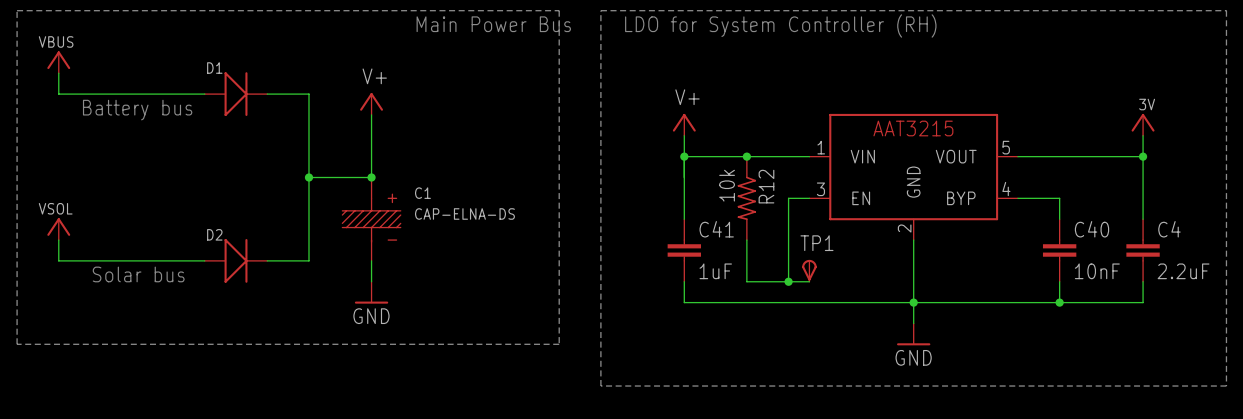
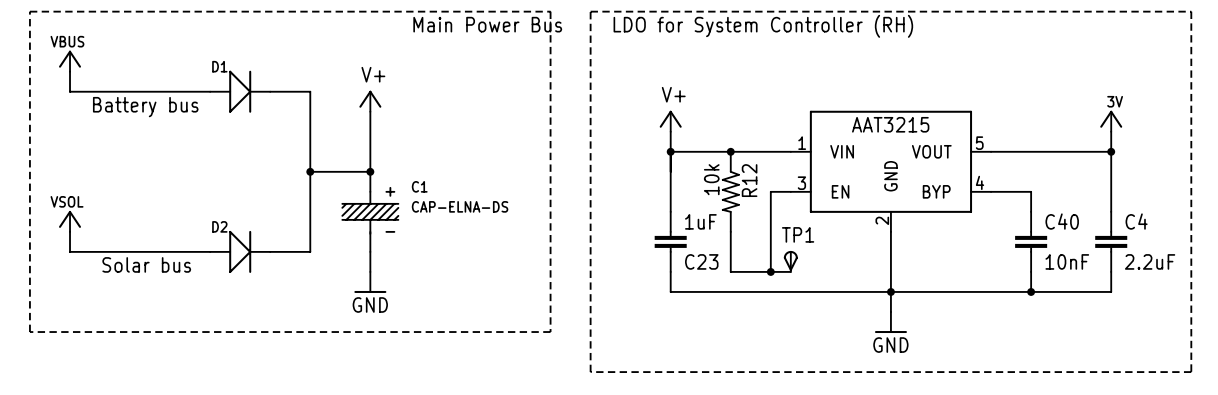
C41 name: C41 (716, 229) -> C23 (701, 261)
C41 value position: 1uF (715, 271) -> 1uF (700, 221)

